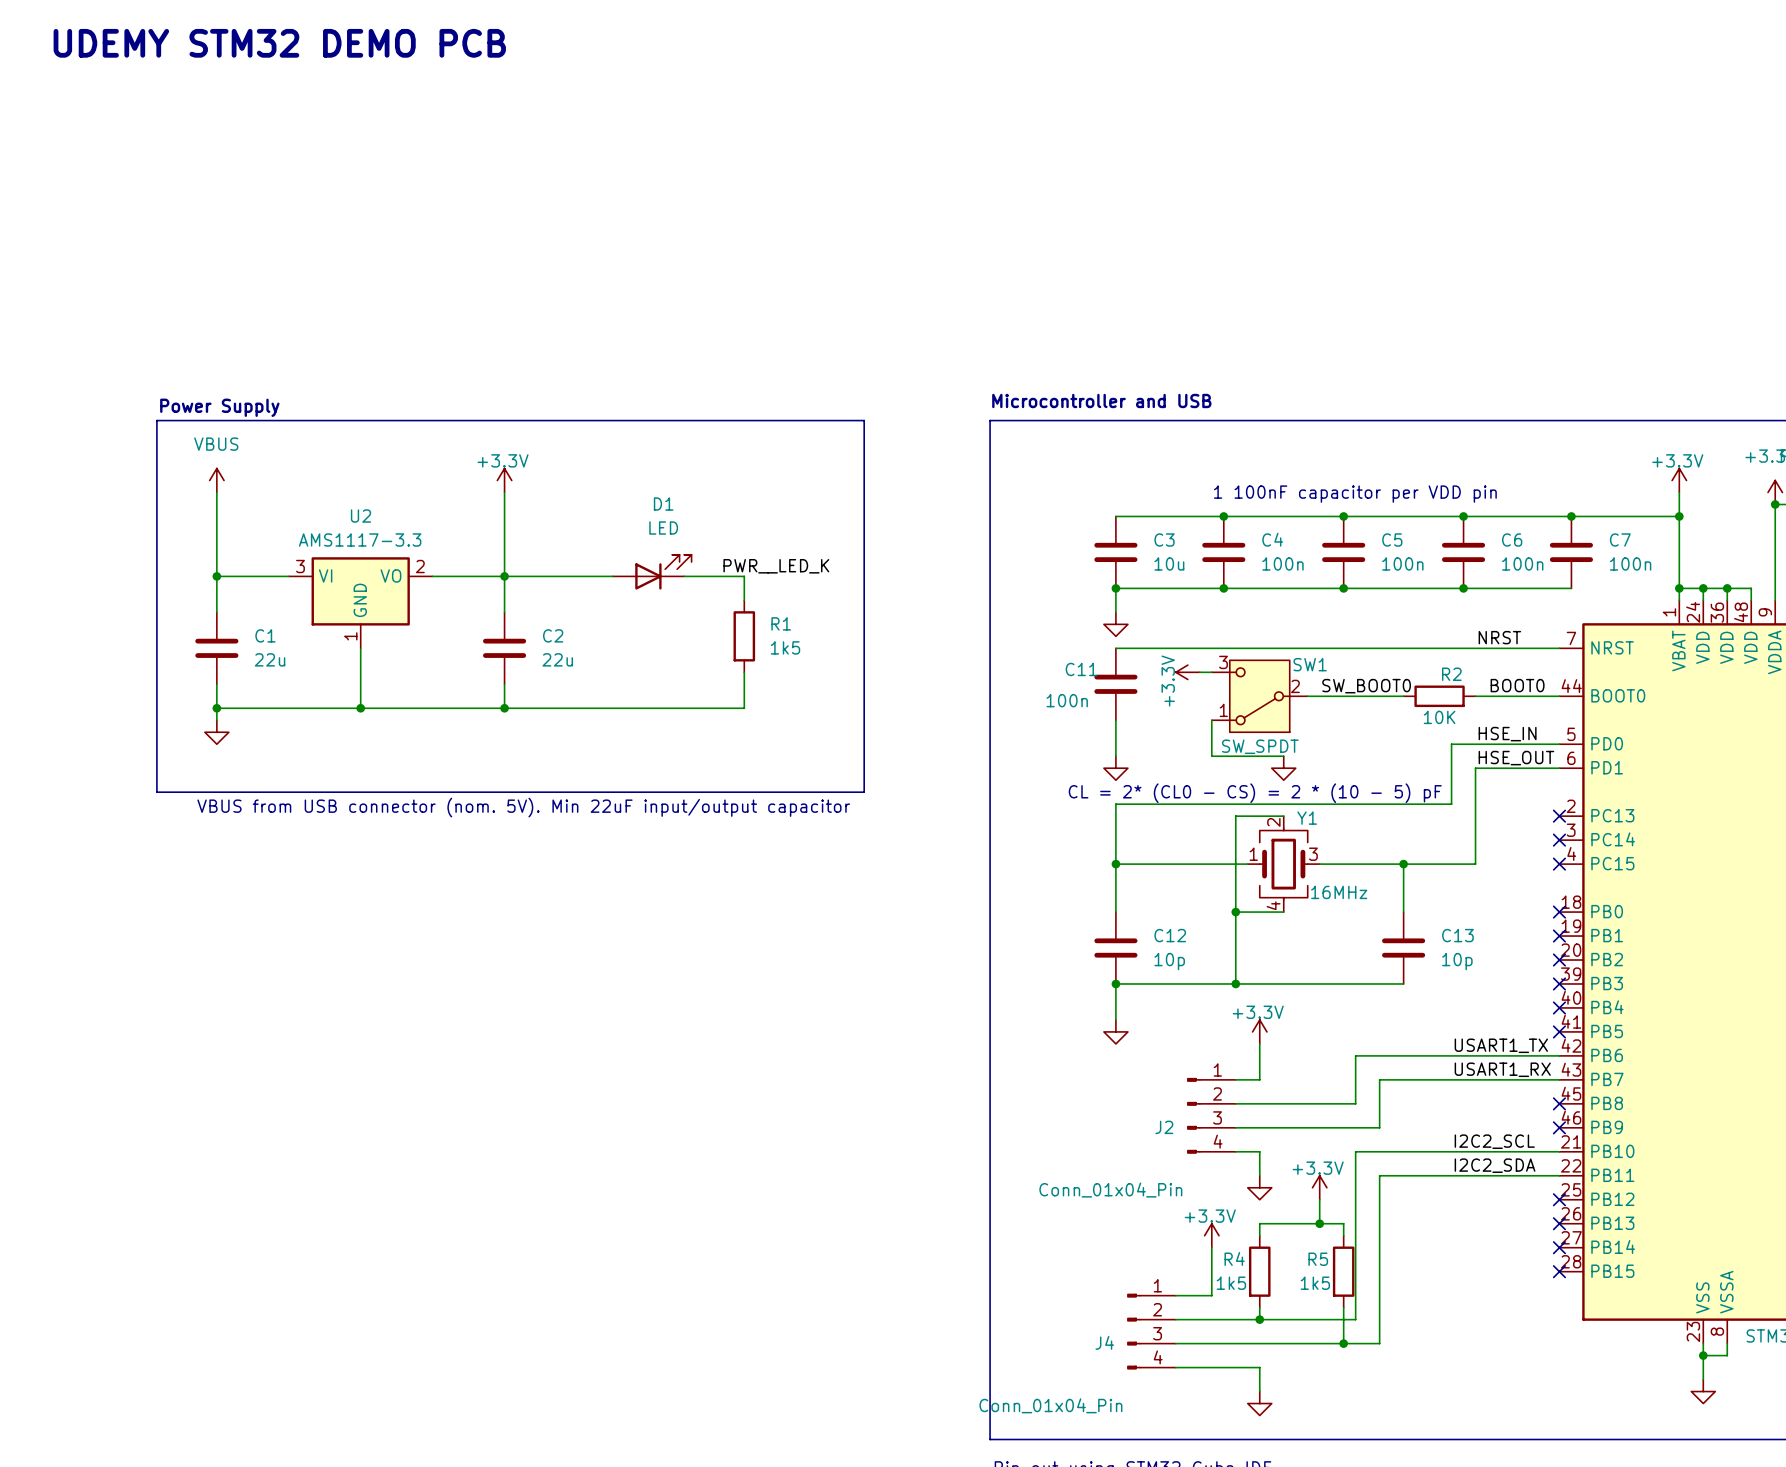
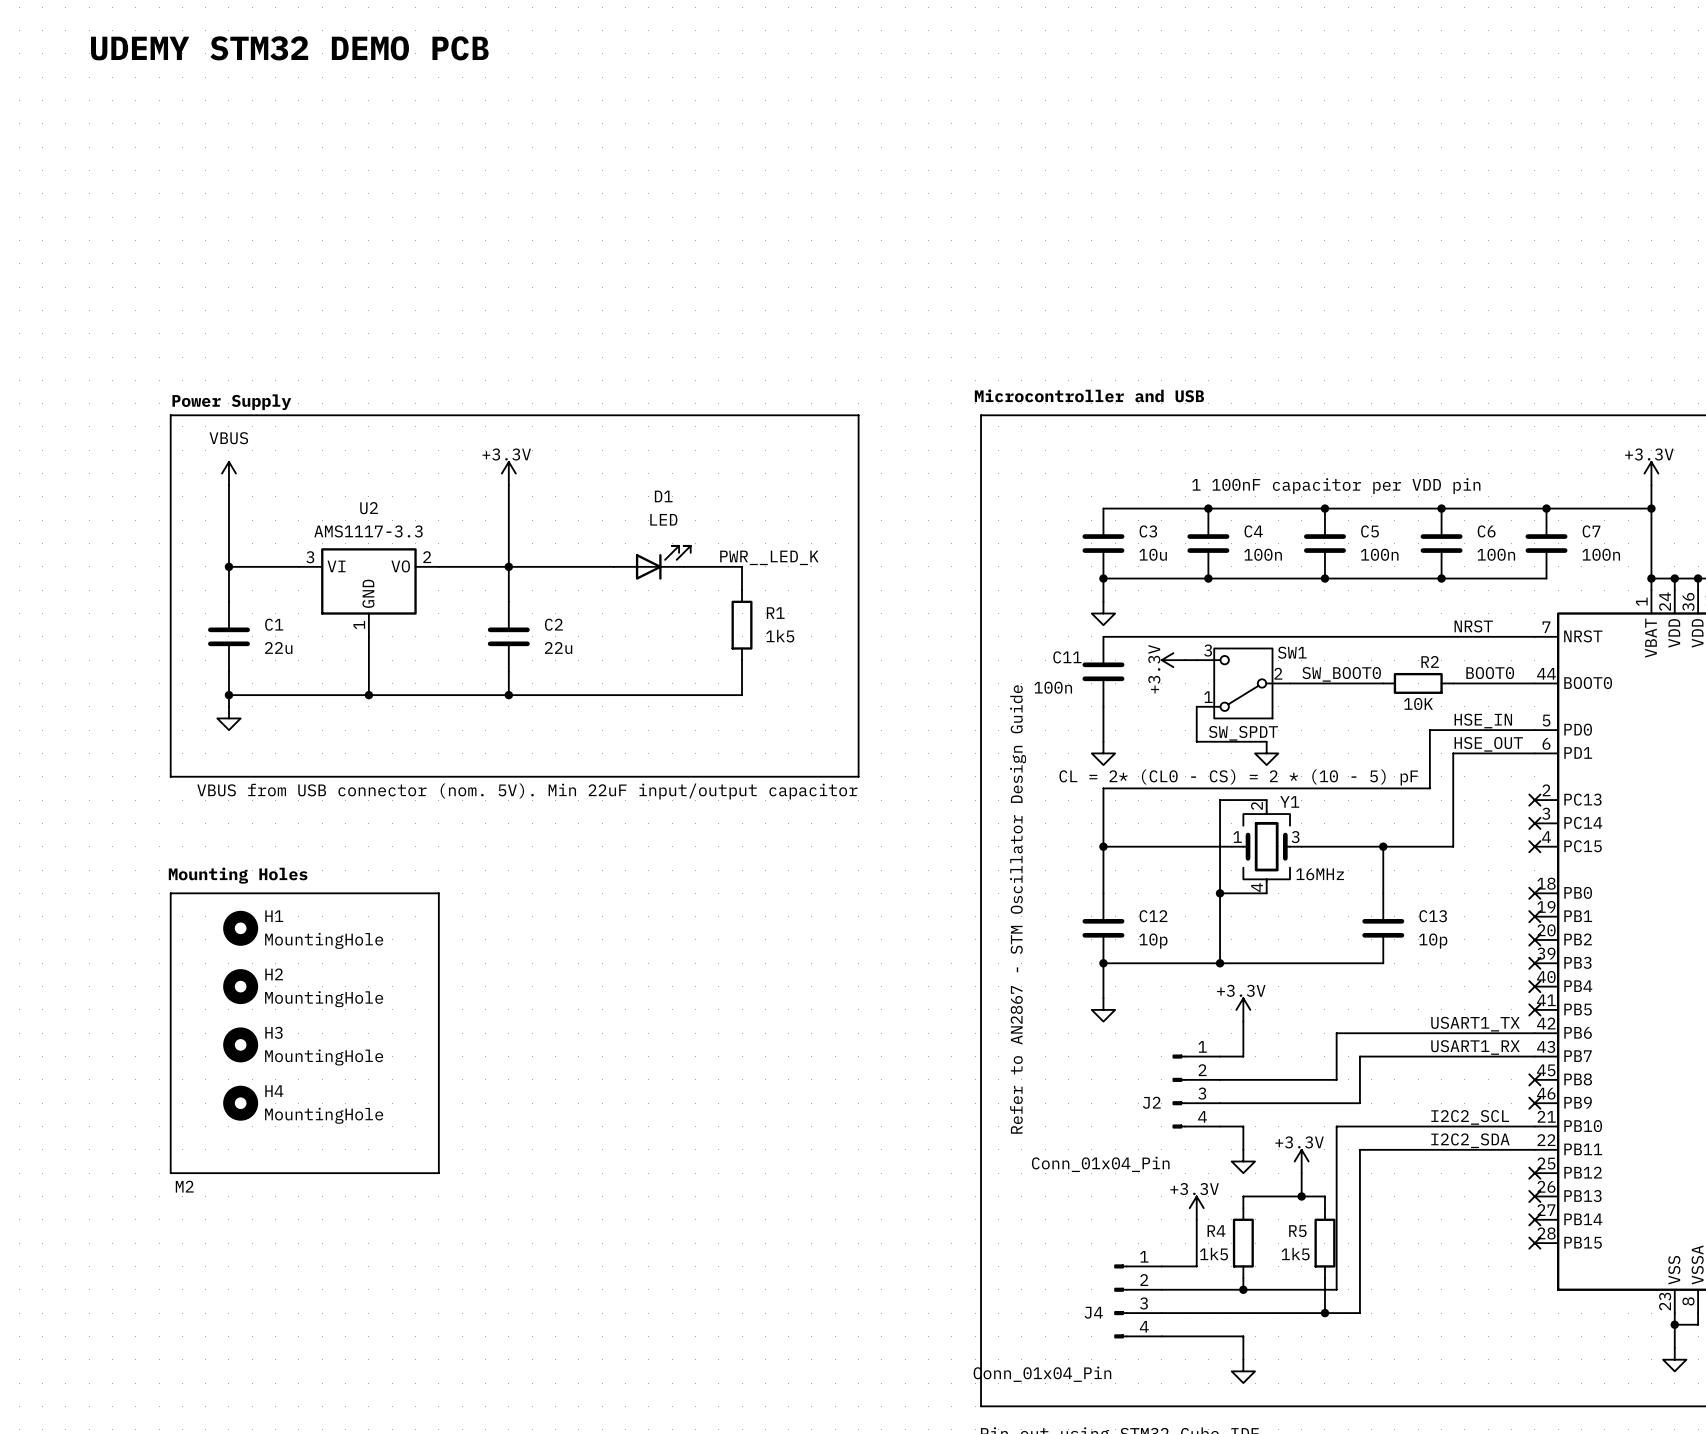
text: none -> Mounting Holes (238, 875)
line: none -> (170, 893) (438, 893) (438, 1173) (170, 1173) (170, 893)
text: none -> Refer to AN2867 - STM Oscillator Design Guide (1018, 909)
H1: none -> MountingHole (240, 928)
H2: none -> MountingHole (240, 986)
H3: none -> MountingHole (240, 1044)
H4: none -> MountingHole (240, 1103)
text: none -> M2 (184, 1186)

